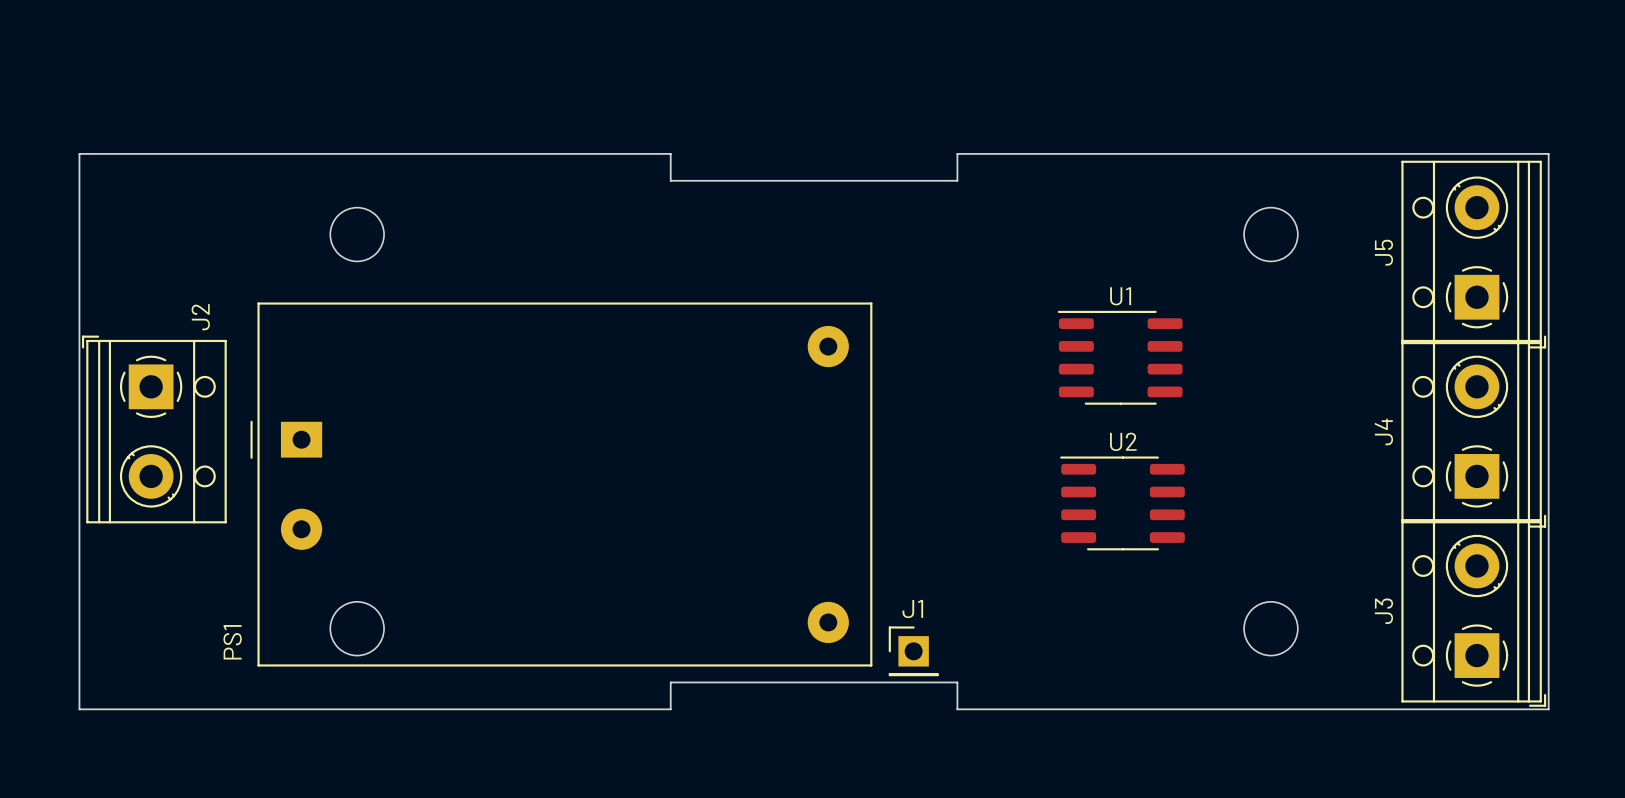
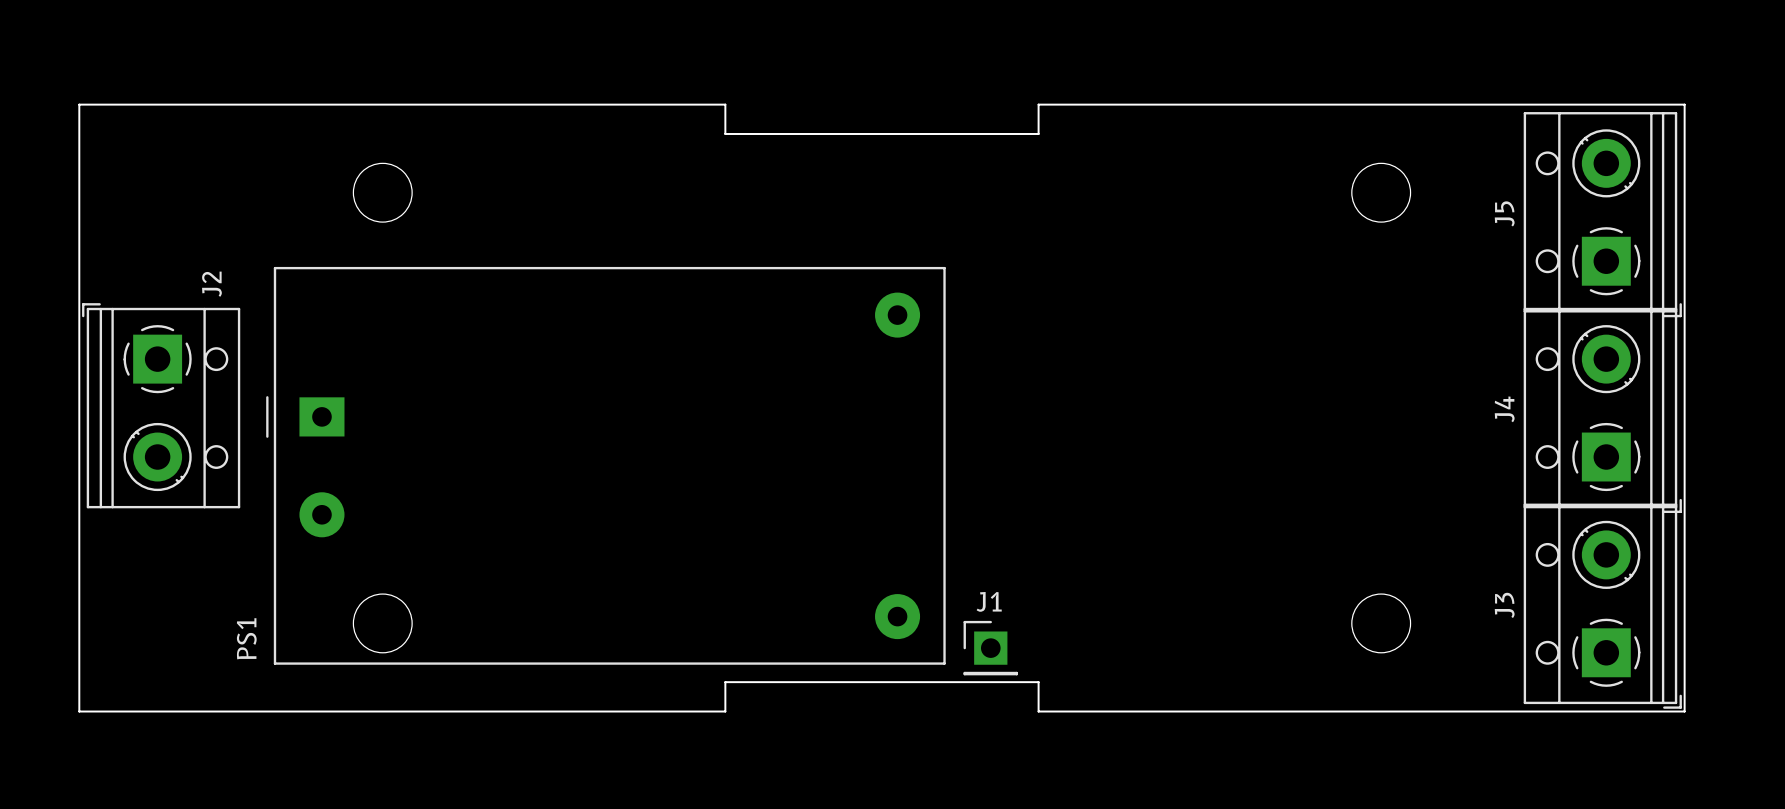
U1: (1120, 357) -> none
U2: (1122, 503) -> none

